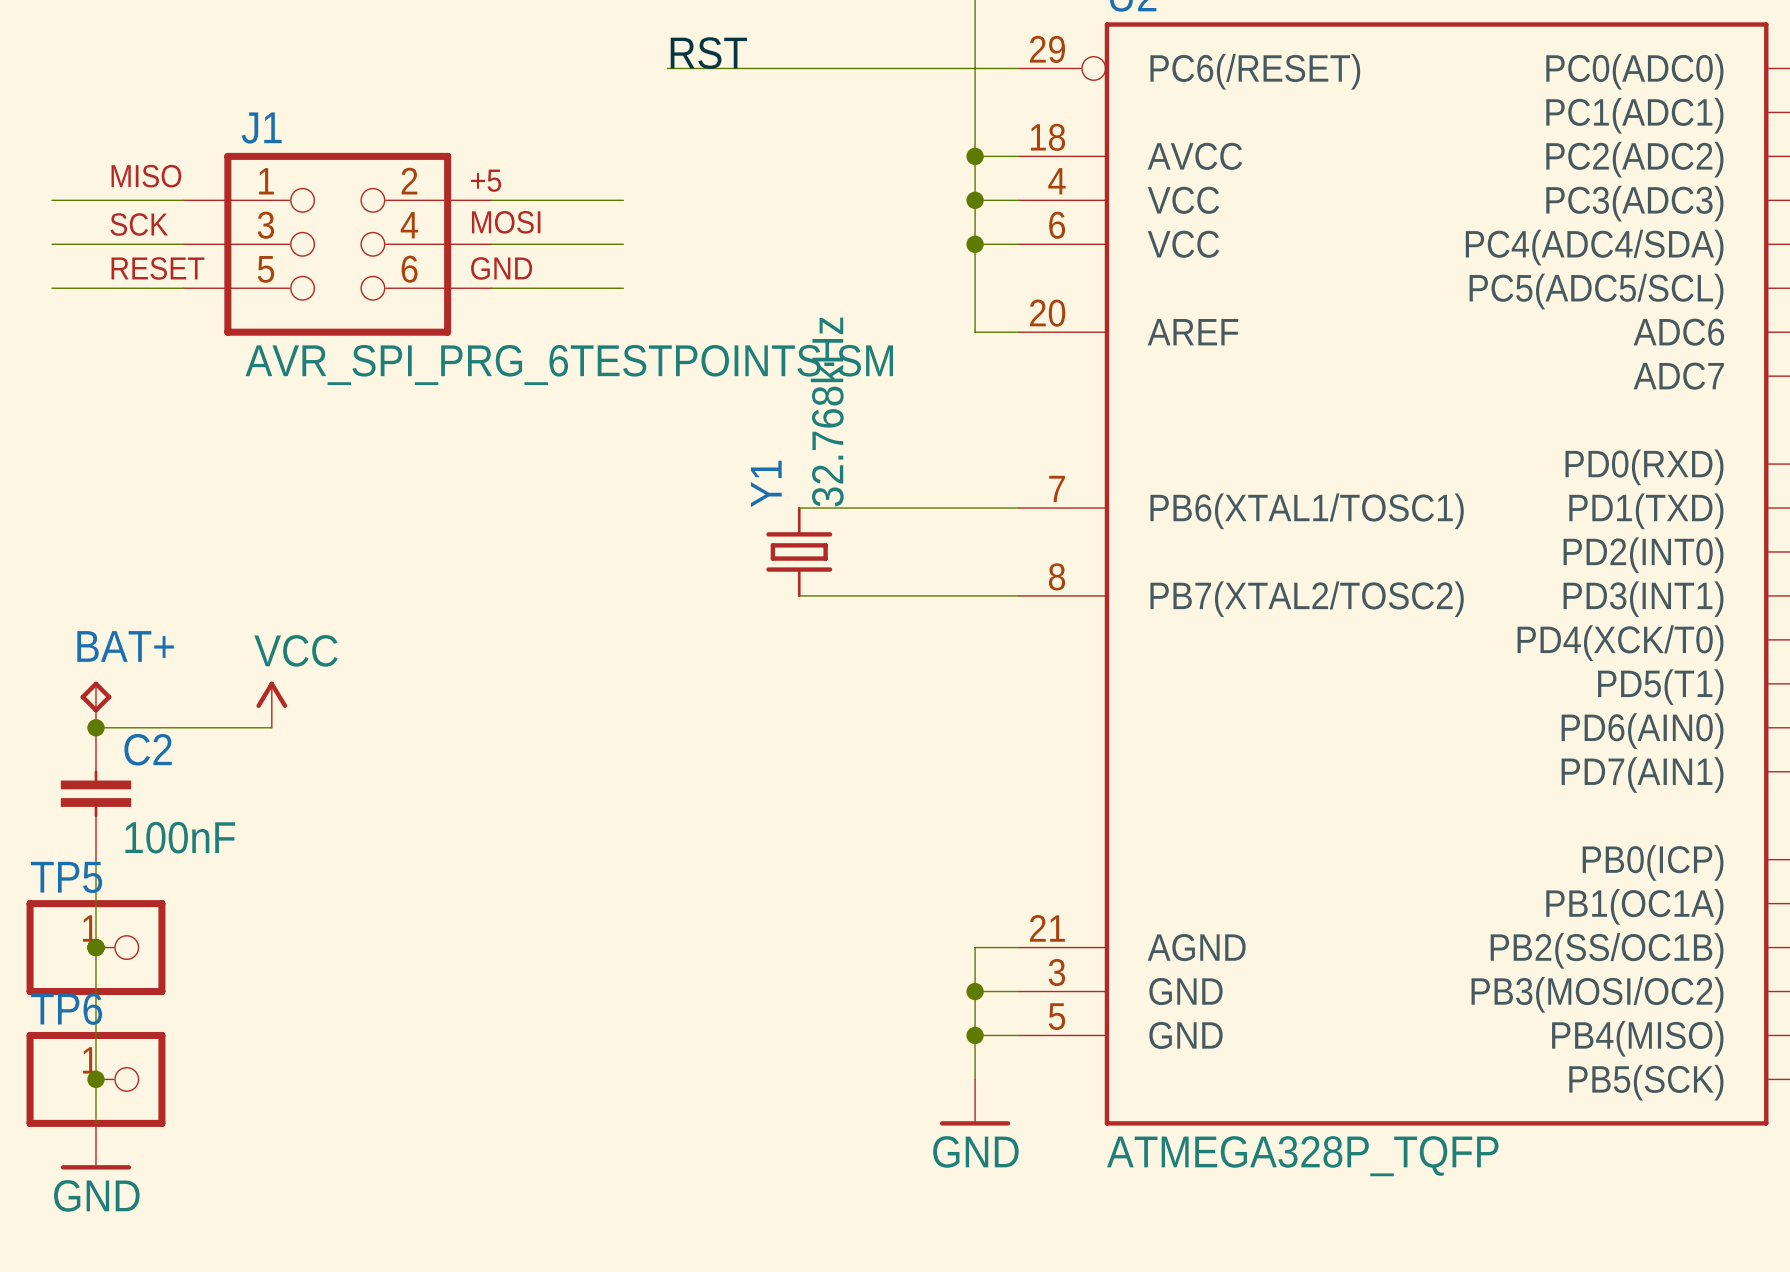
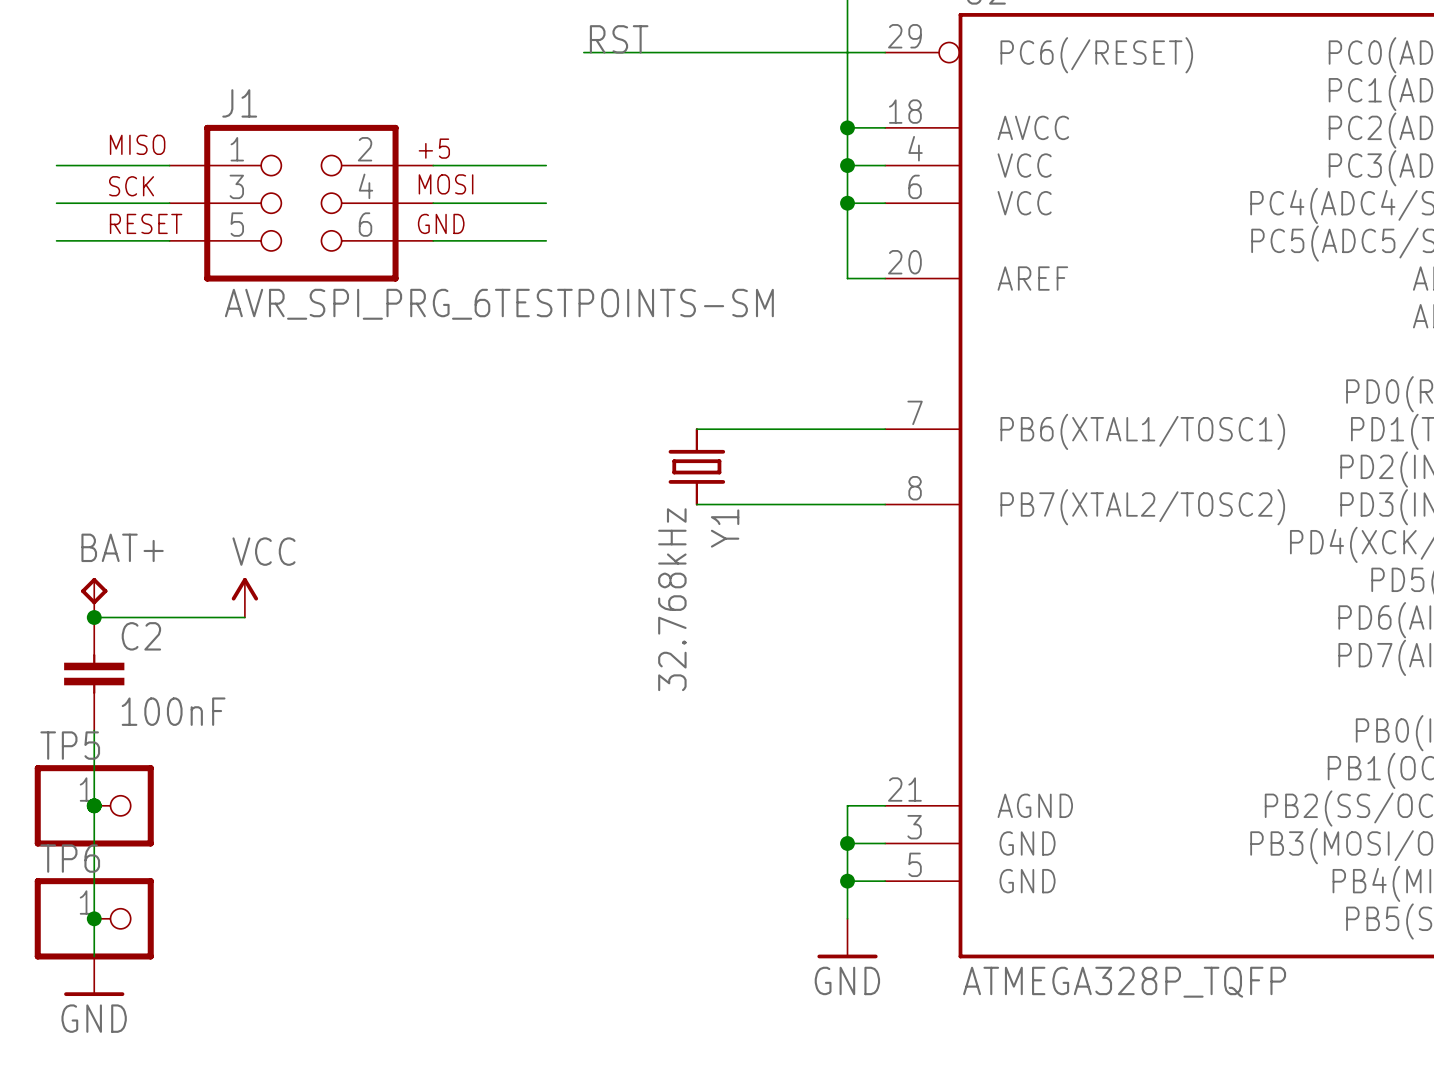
Y1 value position: 32.768kHz (827, 412) -> 32.768kHz (672, 599)
Y1 name position: Y1 (766, 483) -> Y1 (725, 528)

